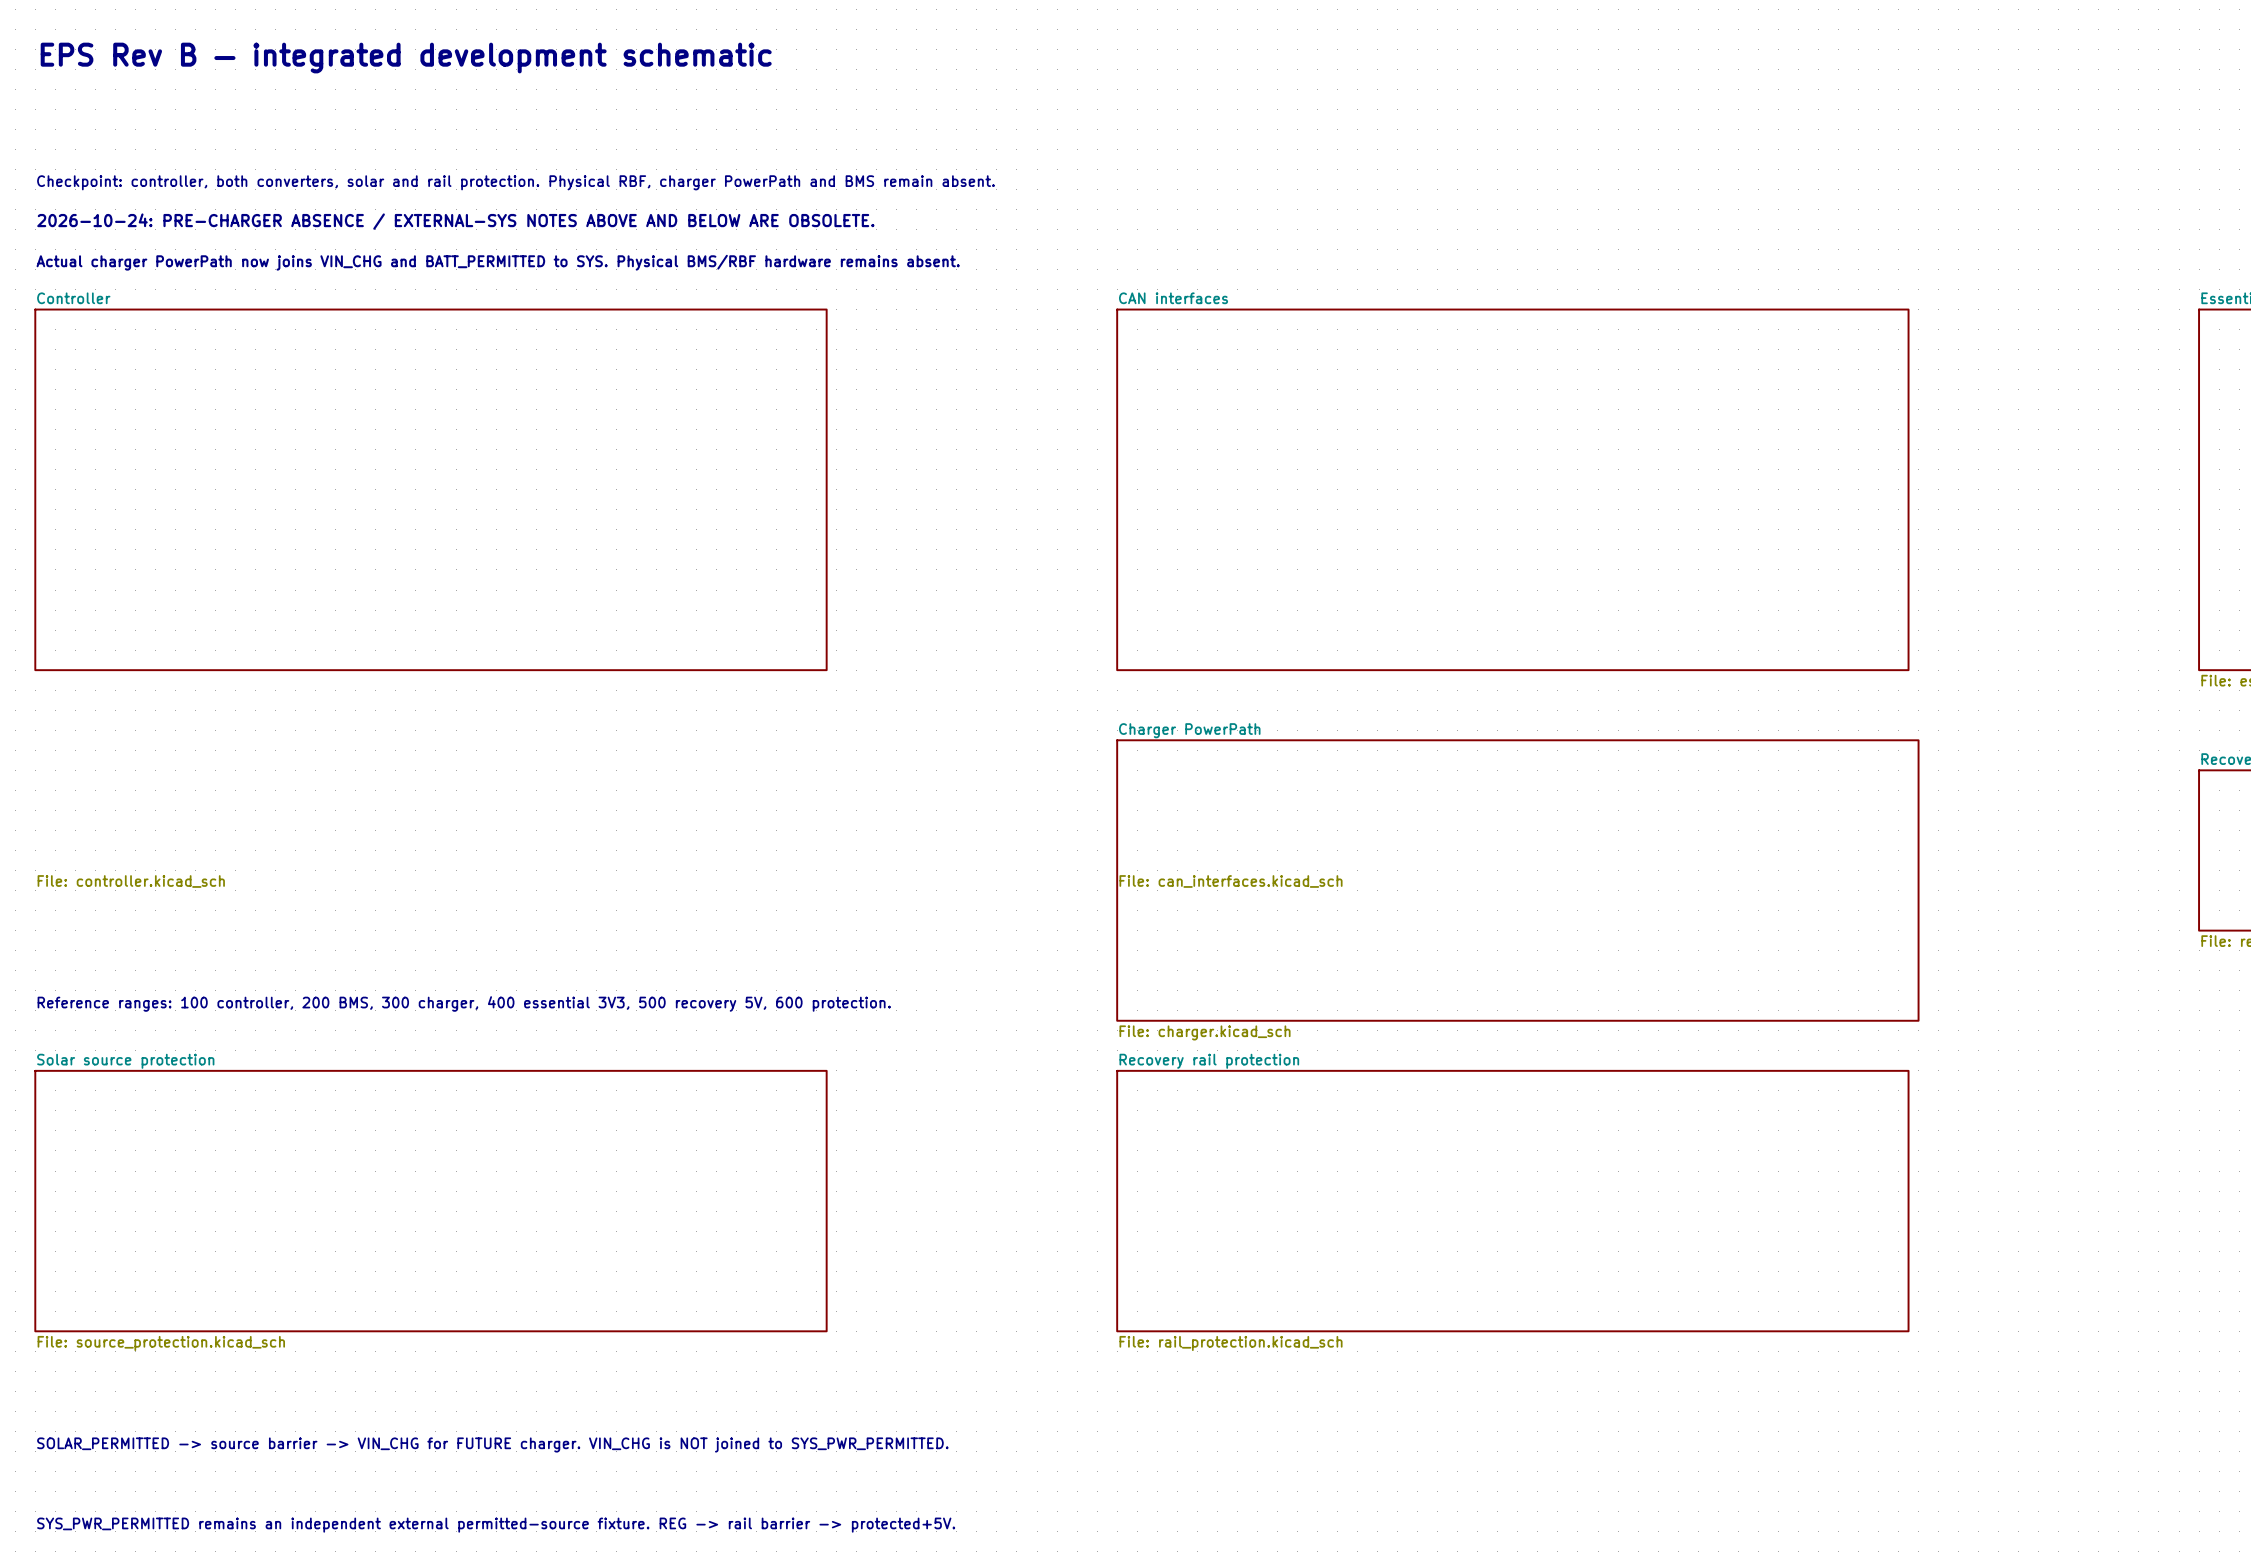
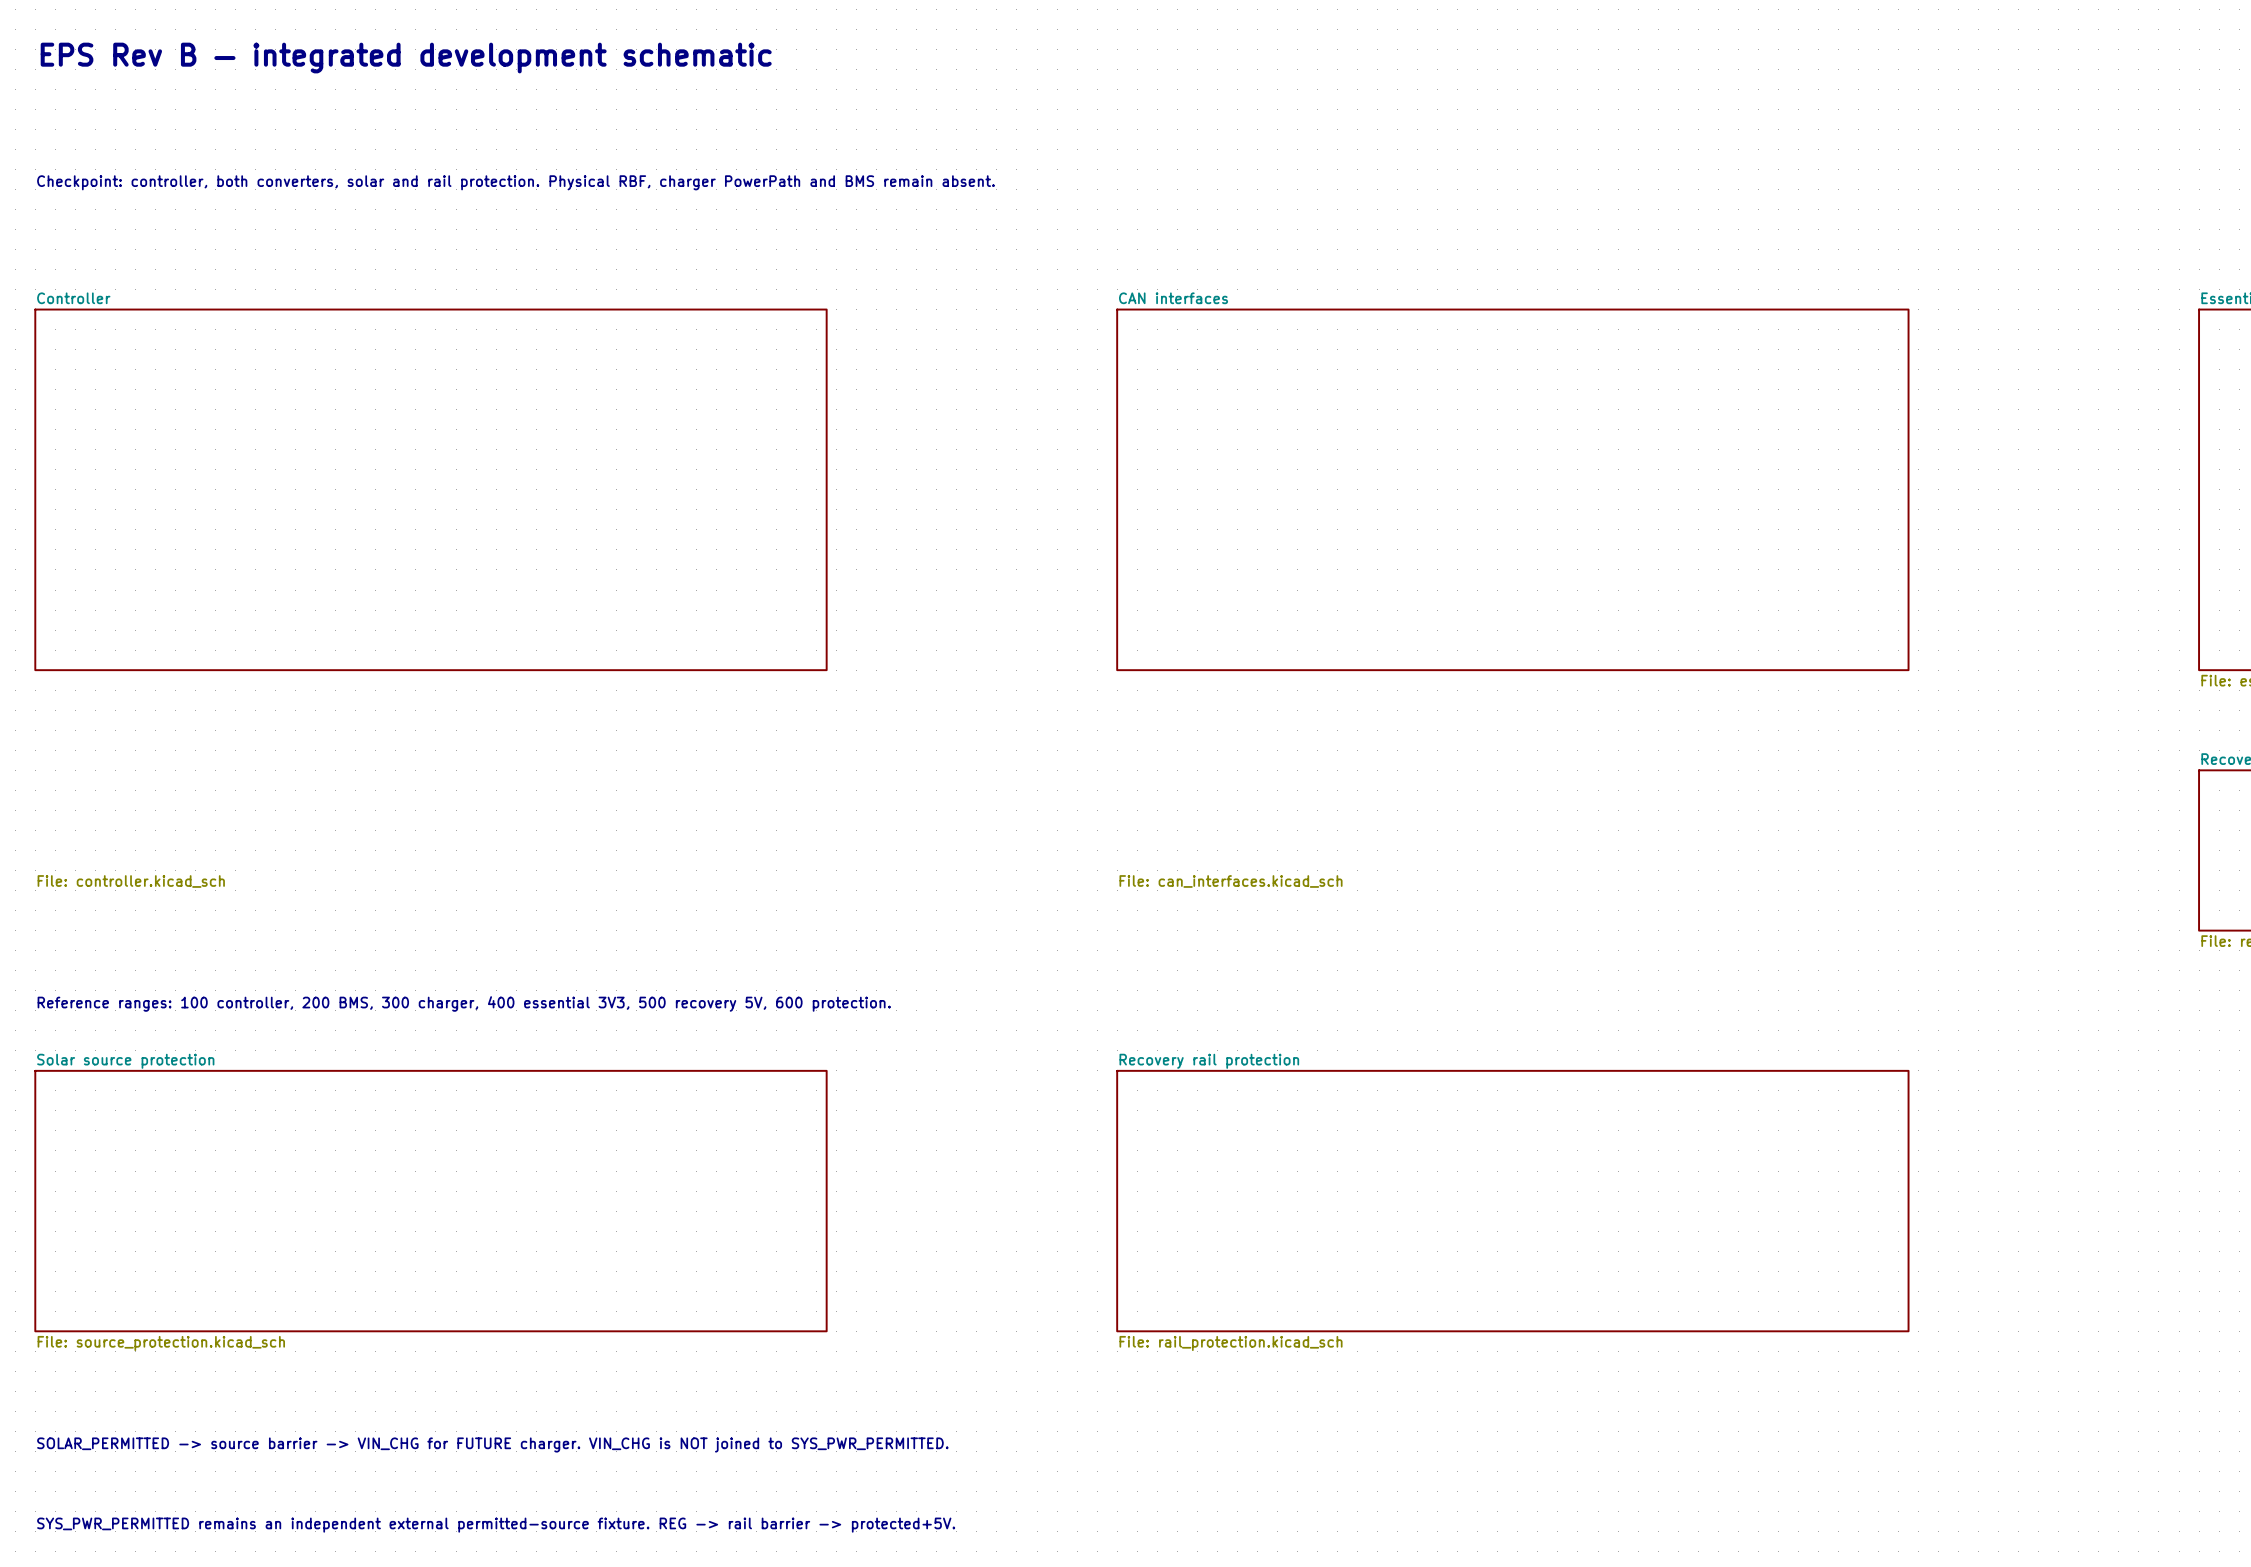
text: 2026-10-24: PRE-CHARGER ABSENCE / EXTERNAL-SYS NOTES ABOVE AND BELOW ARE OBSOLETE. (455, 221) -> none
text: Actual charger PowerPath now joins VIN_CHG and BATT_PERMITTED to SYS. Physical BMS/RBF hardware remains absent. (498, 262) -> none
sheet Charger PowerPath: File: charger.kicad_sch (1517, 880) -> none

